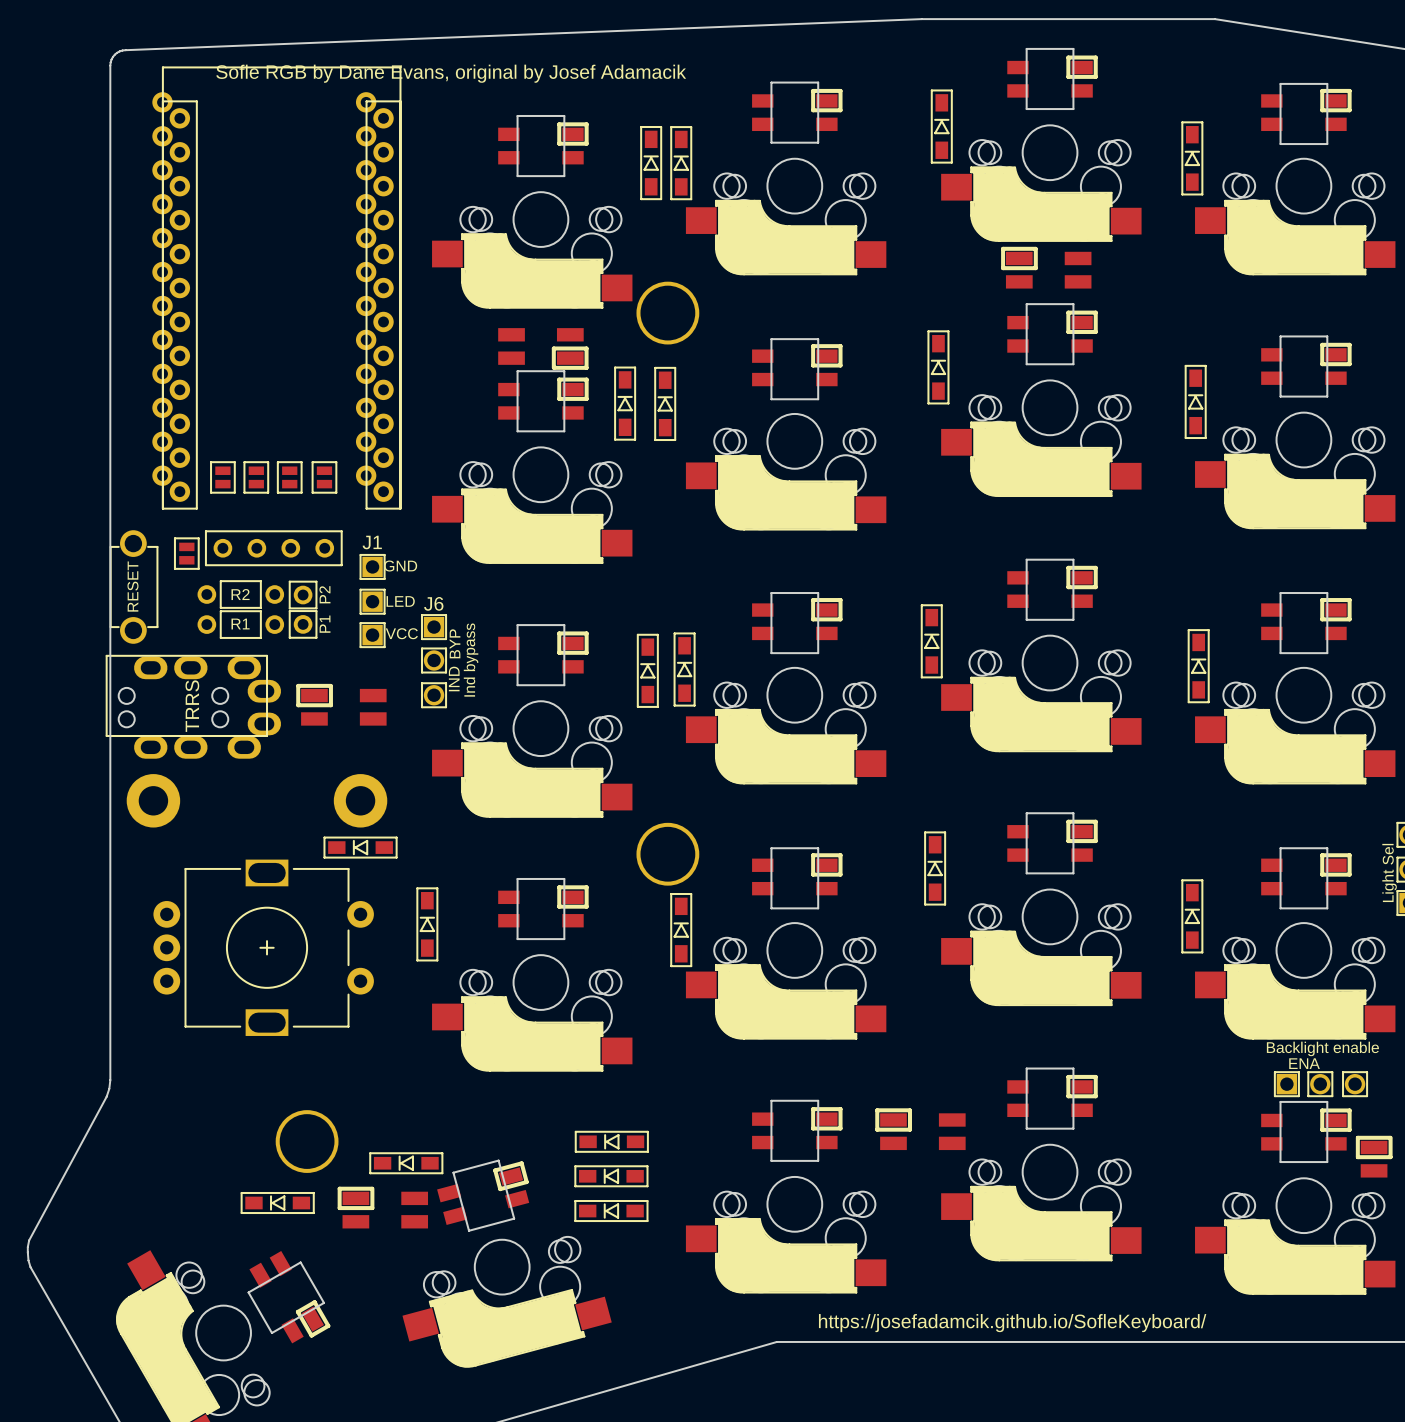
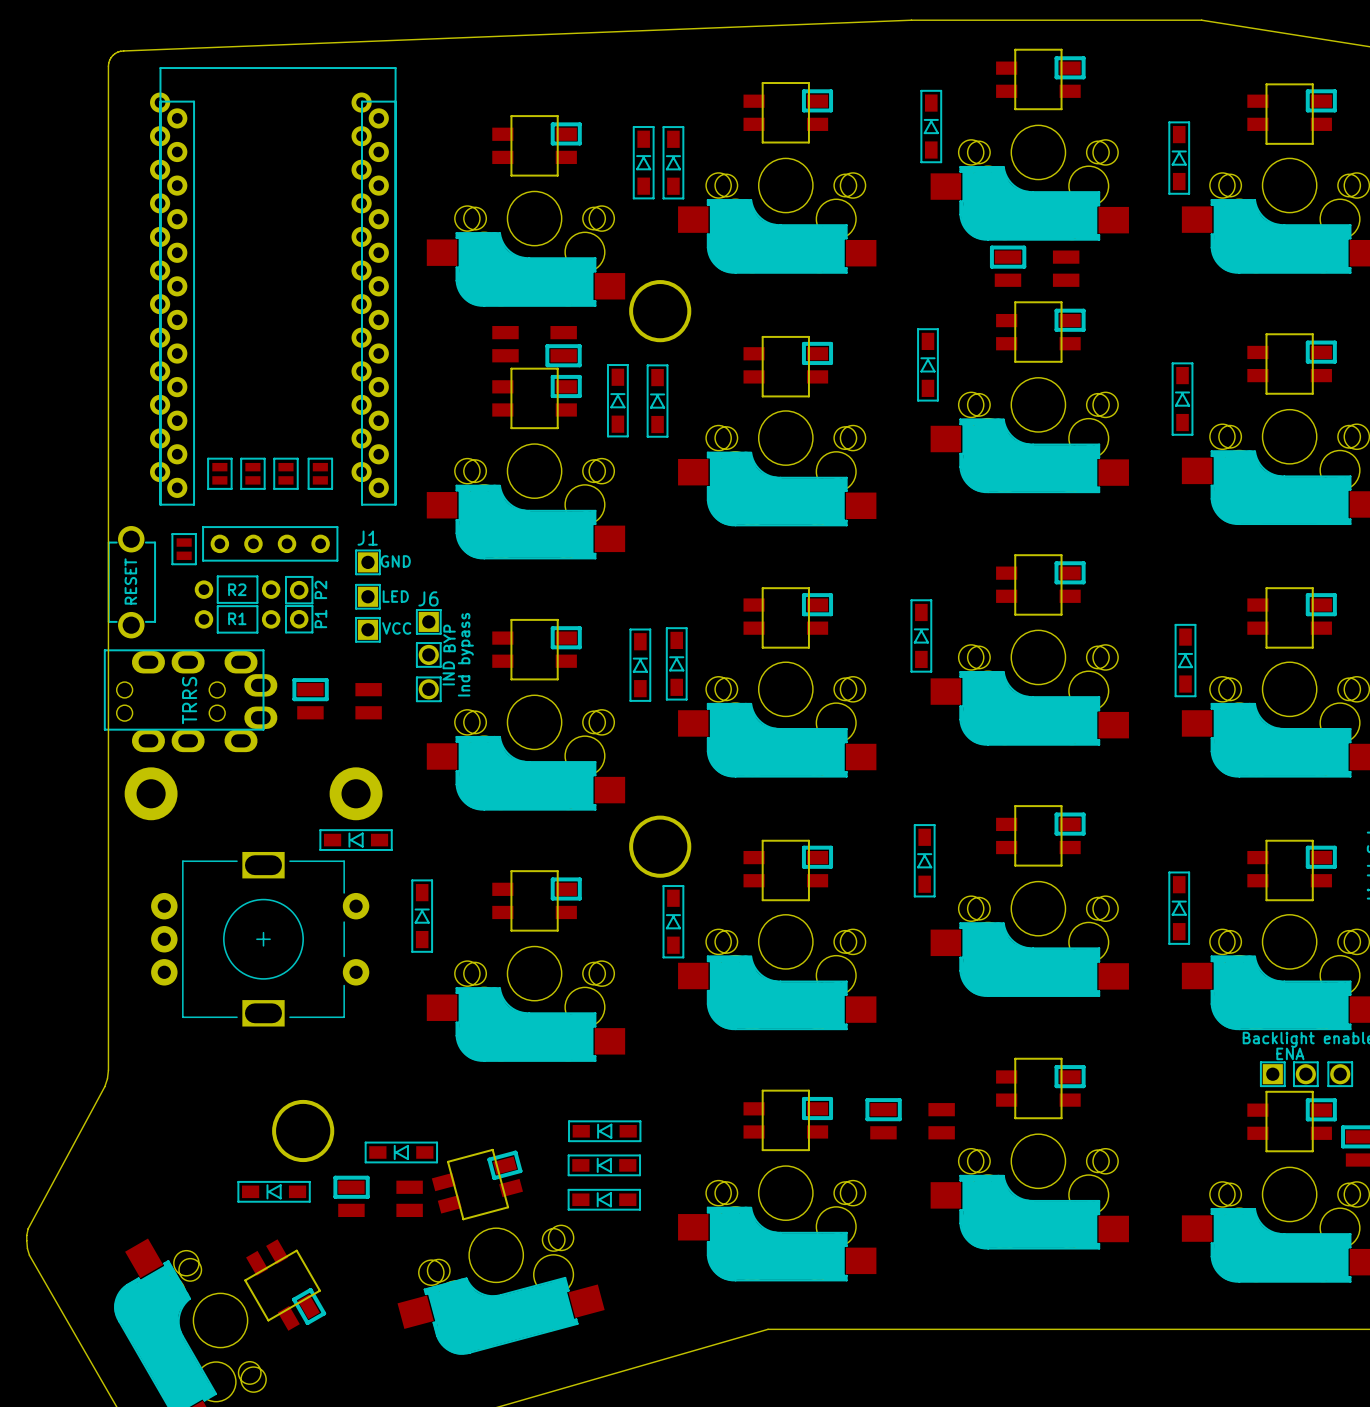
text: Sofle RGB by Dane Evans, original by Josef Adamacik (451, 73) -> none
text: https://josefadamcik.github.io/SofleKeyboard/ (1012, 1323) -> none

